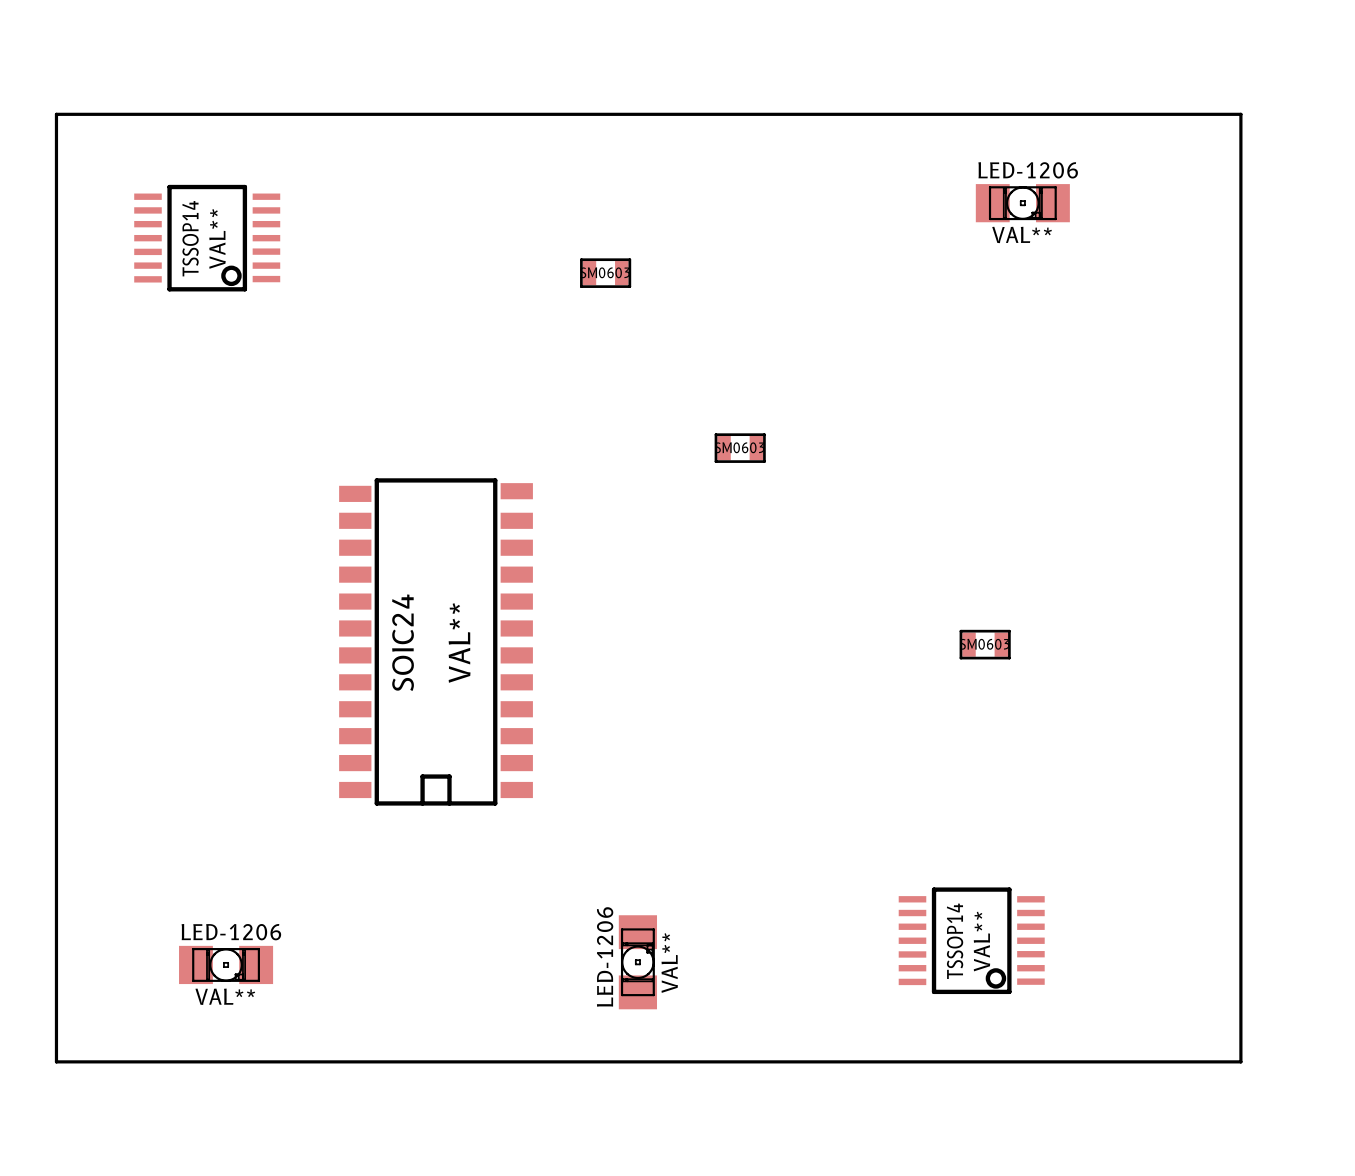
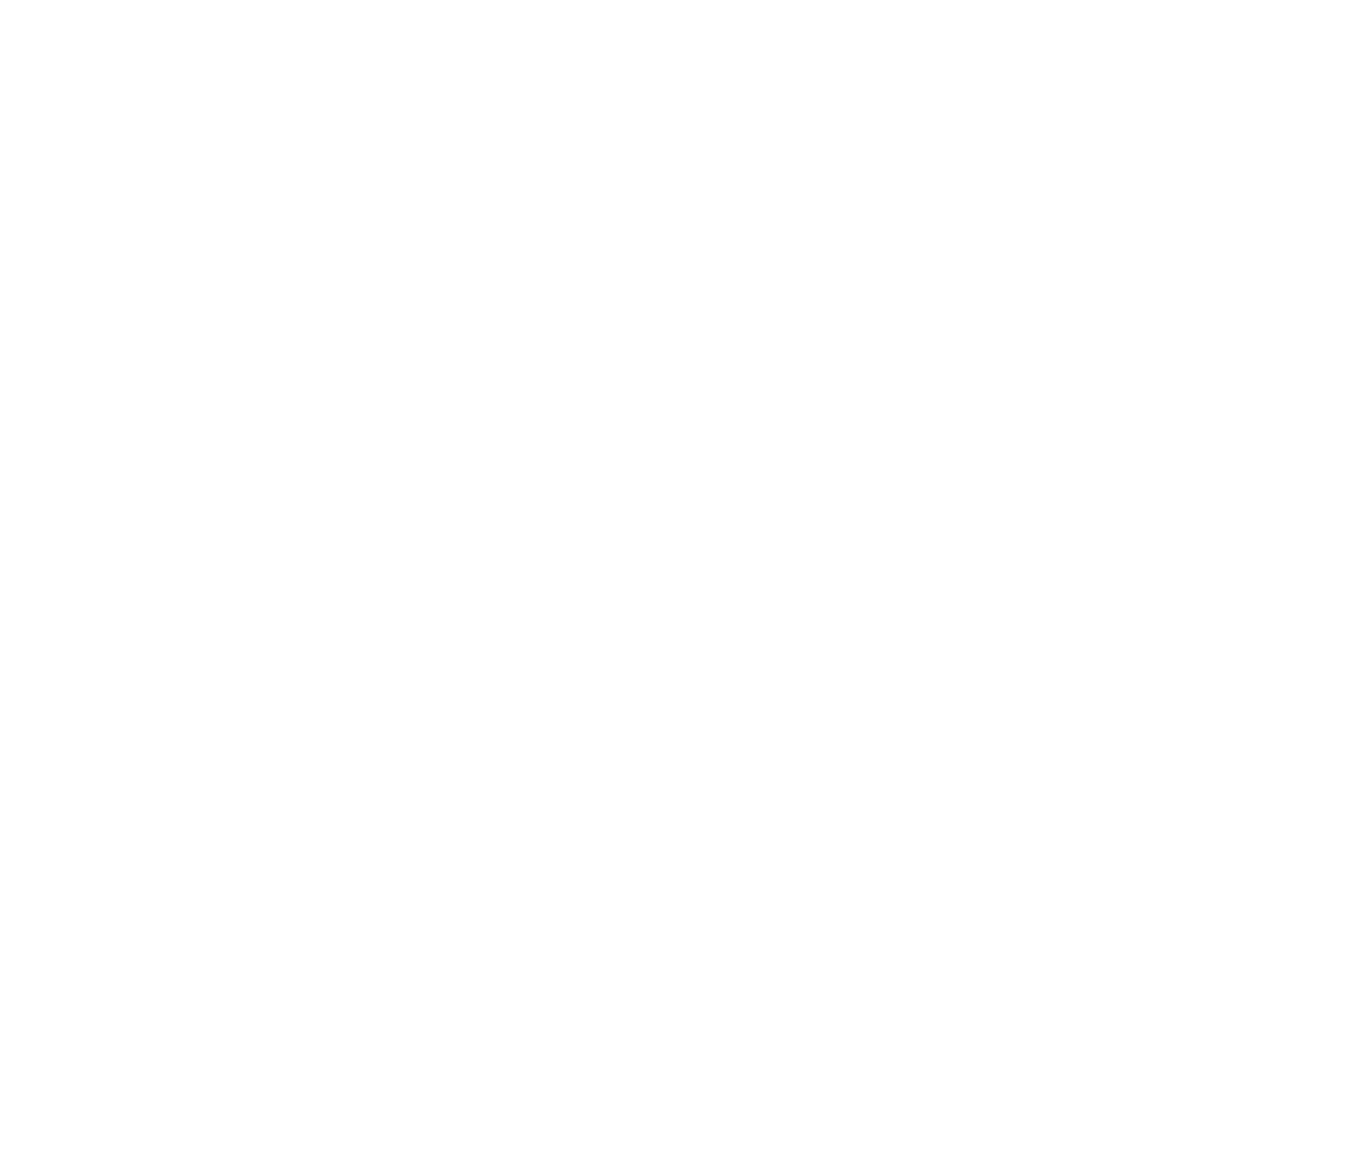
board edge: (56, 114) (1240, 114) (1240, 1061) (56, 1061) (56, 114) -> none
LED-1206: VAL** (1022, 203) -> none
TSSOP14: VAL** (207, 238) -> none
SM0603: (605, 273) -> none
SM0603: (740, 448) -> none
SOIC24: VAL** (436, 641) -> none
SM0603: (985, 644) -> none
TSSOP14: VAL** (971, 940) -> none
LED-1206: VAL** (637, 962) -> none
LED-1206: VAL** (226, 964) -> none

